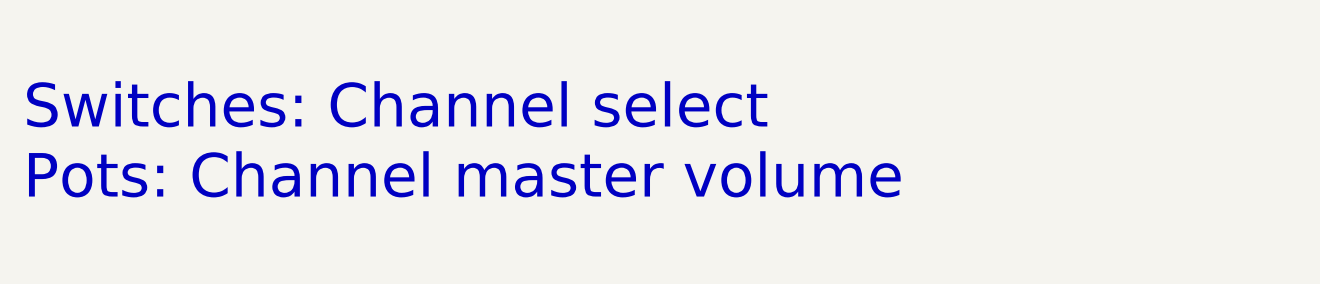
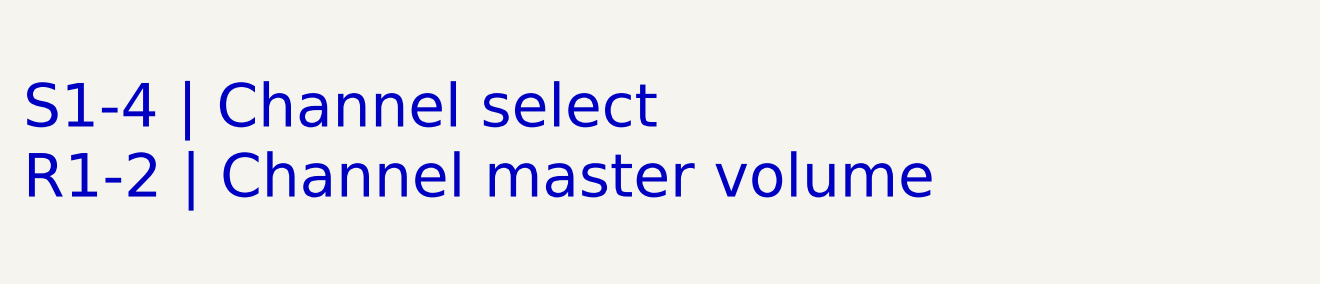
text: Switches: Channel select (397, 104) -> S1-4 | Channel select (341, 110)
text: Pots: Channel master volume (464, 174) -> R1-2 | Channel master volume (480, 180)

